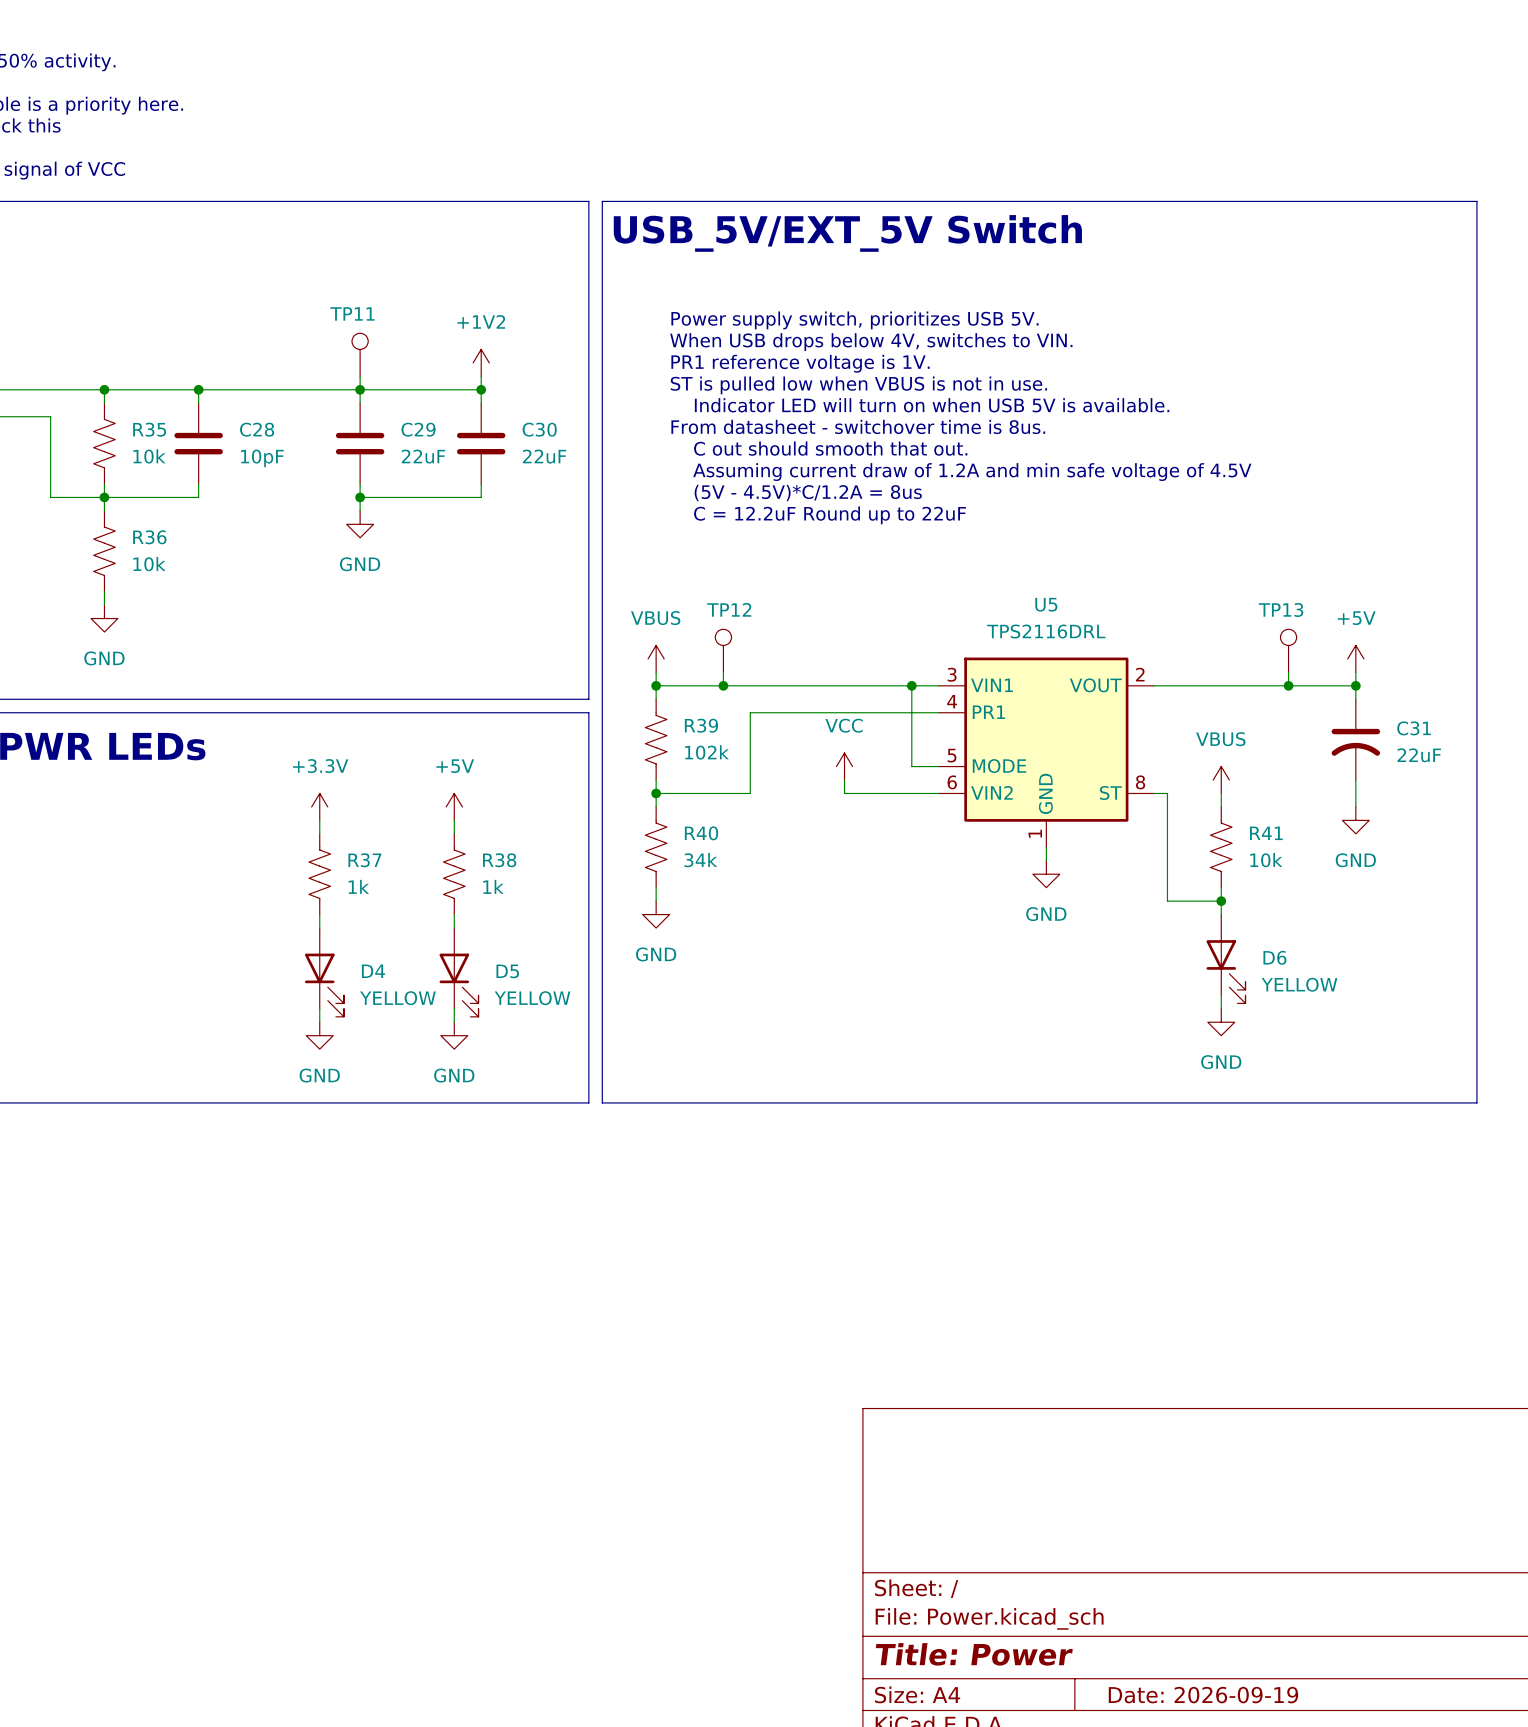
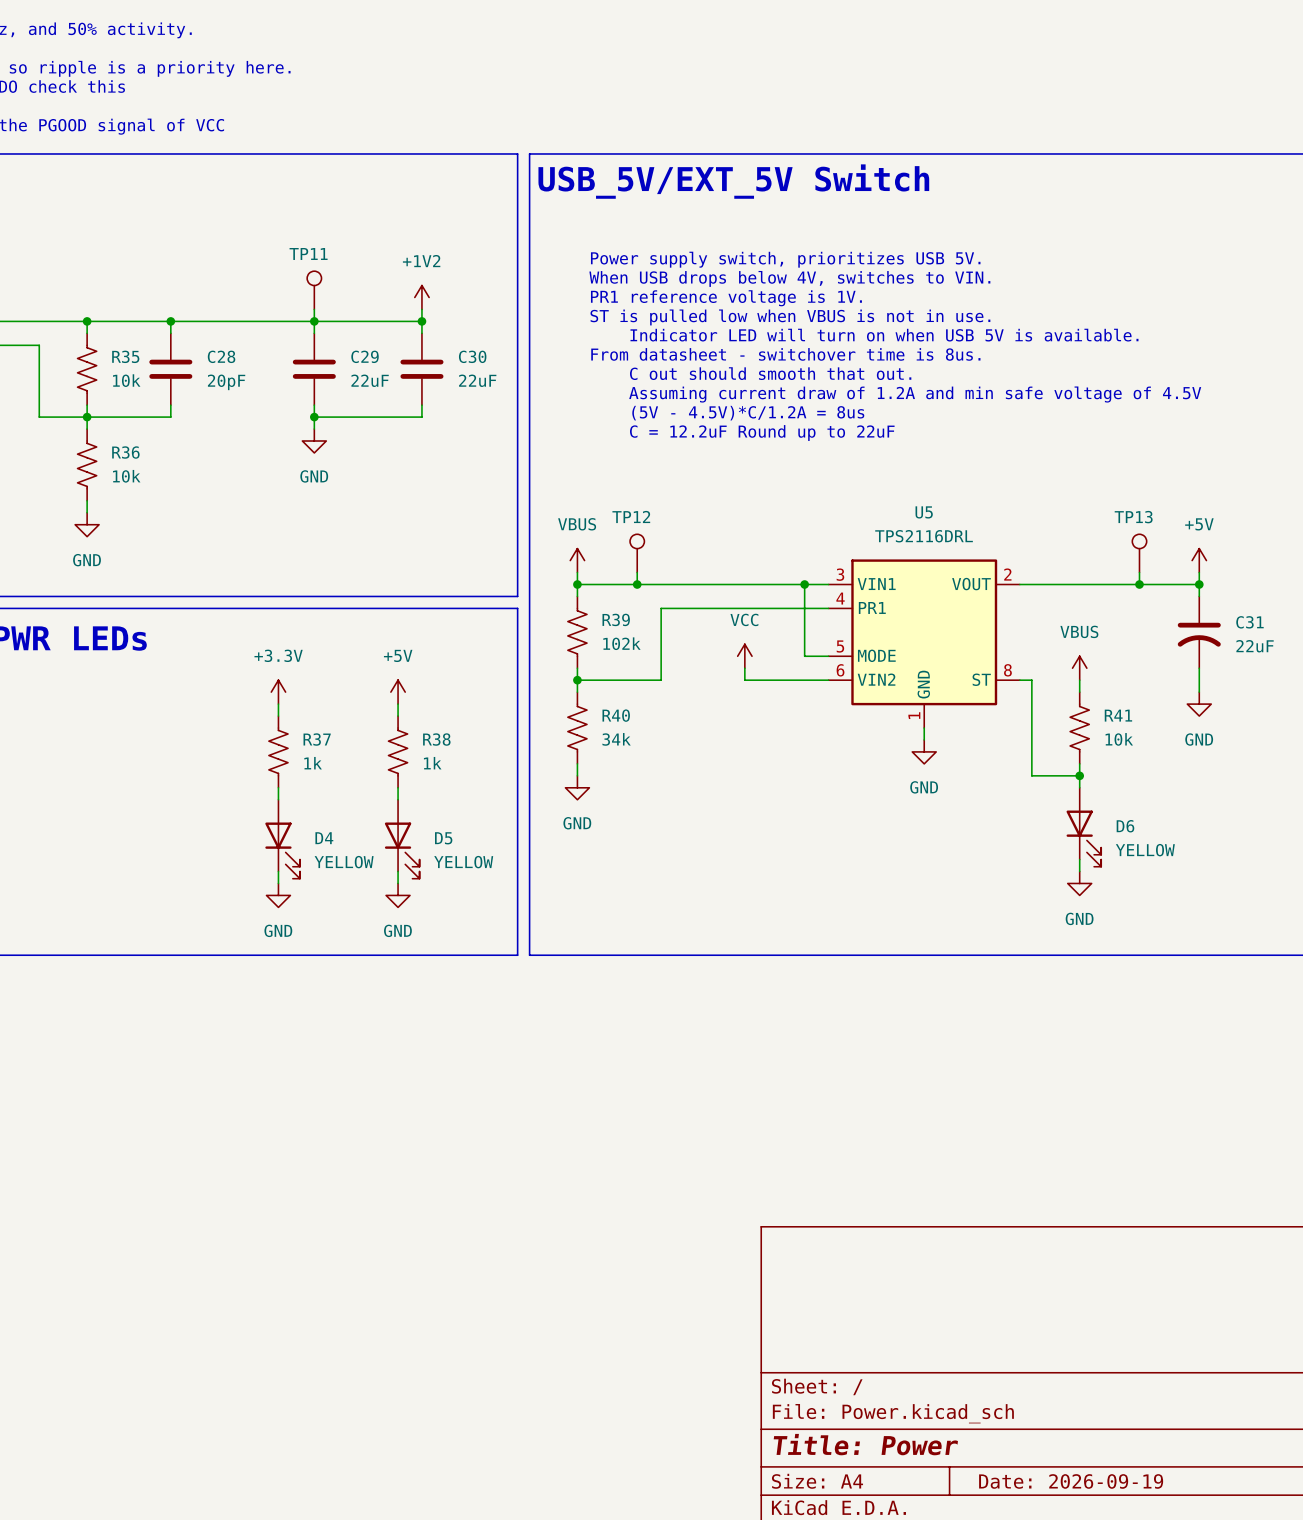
C28 value: 10pF (262, 458) -> 20pF (226, 382)
TP12 name position: TP12 (729, 609) -> TP12 (631, 516)

